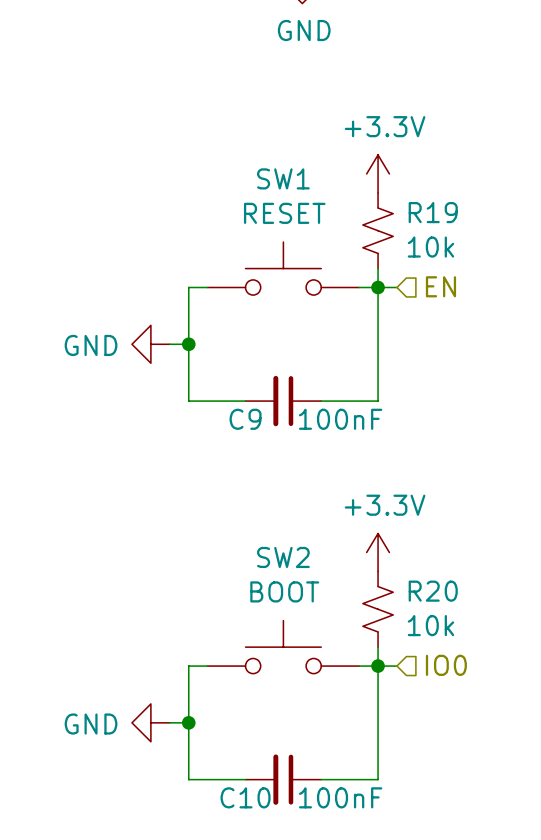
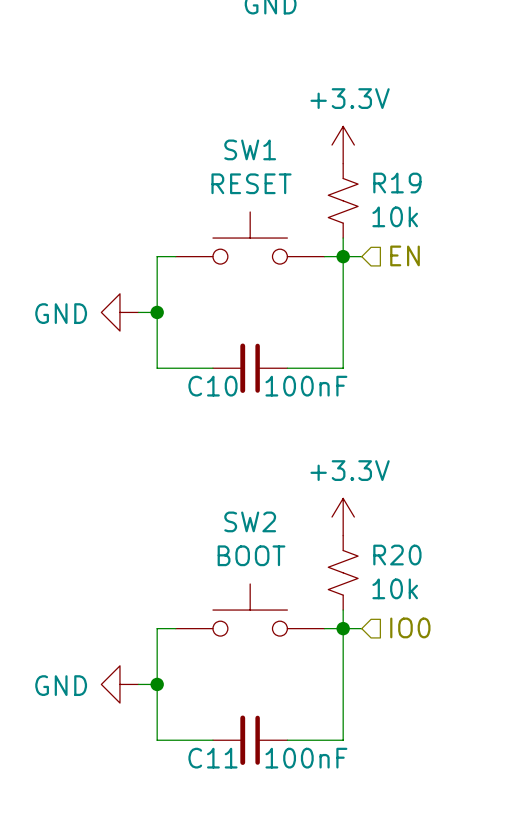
C9 name: C9 (245, 419) -> C10 (212, 386)
C10 name: C10 (245, 797) -> C11 (212, 758)

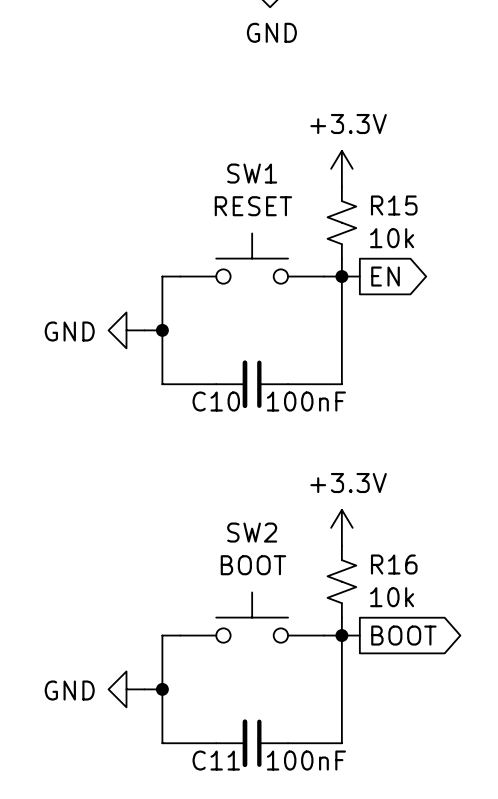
R19 name: R19 (397, 183) -> R15 (394, 205)
hierarchical label: EN (405, 255) -> none
global label: none -> EN (385, 276)
R20 name: R20 (397, 555) -> R16 (394, 564)
hierarchical label: IO0 (410, 627) -> none
global label: none -> BOOT (403, 635)

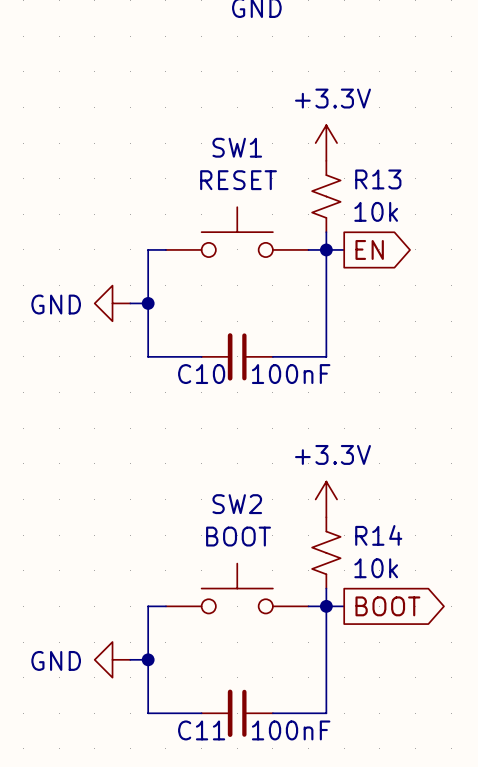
R15 name: R15 (394, 205) -> R13 (378, 179)
R16 name: R16 (394, 564) -> R14 (378, 535)

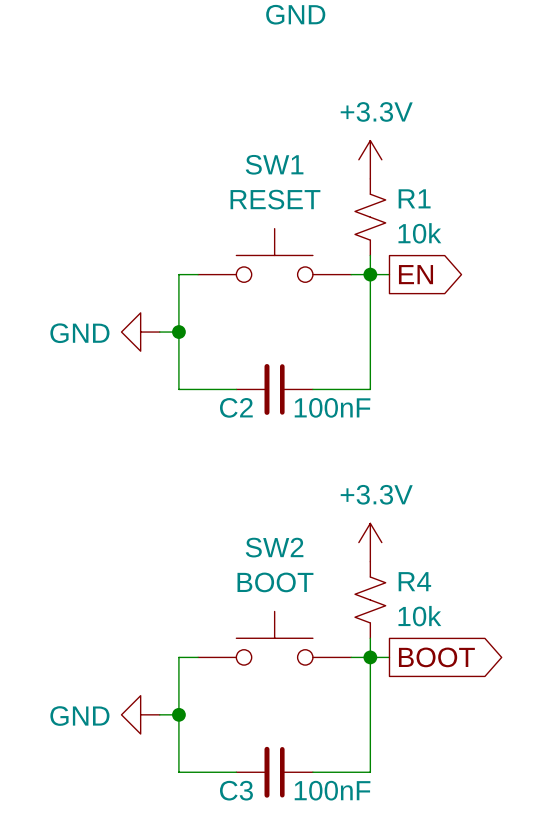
R13 name: R13 (378, 179) -> R1 (414, 198)
C10 name: C10 (201, 374) -> C2 (236, 407)
R14 name: R14 (378, 535) -> R4 (414, 581)
C11 name: C11 (201, 730) -> C3 (236, 790)

